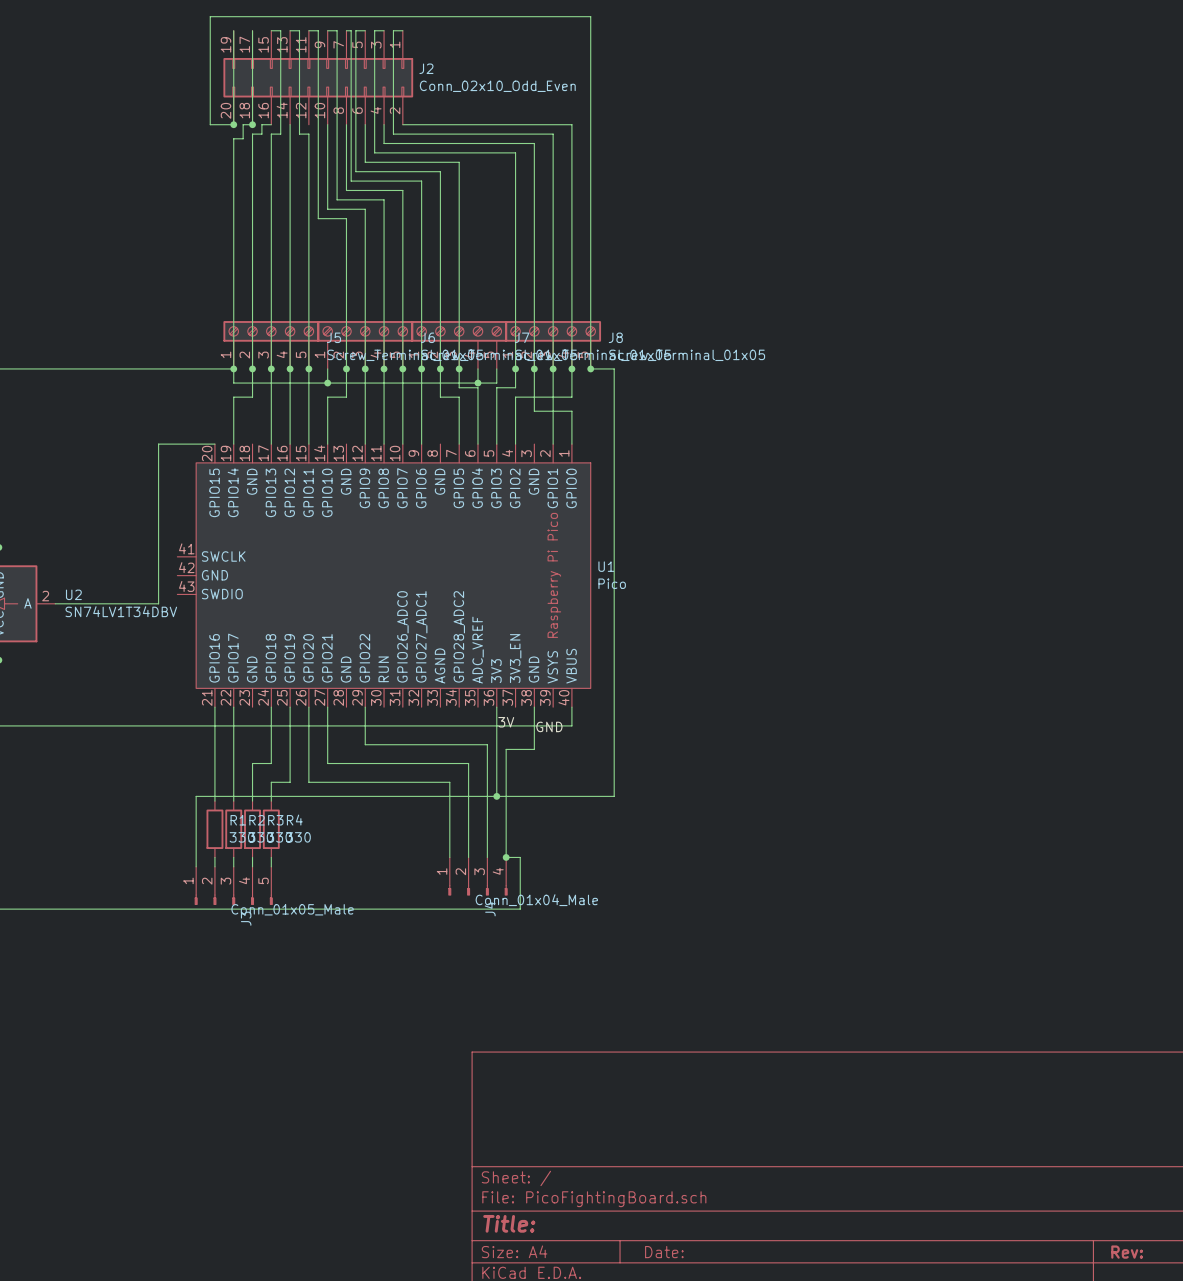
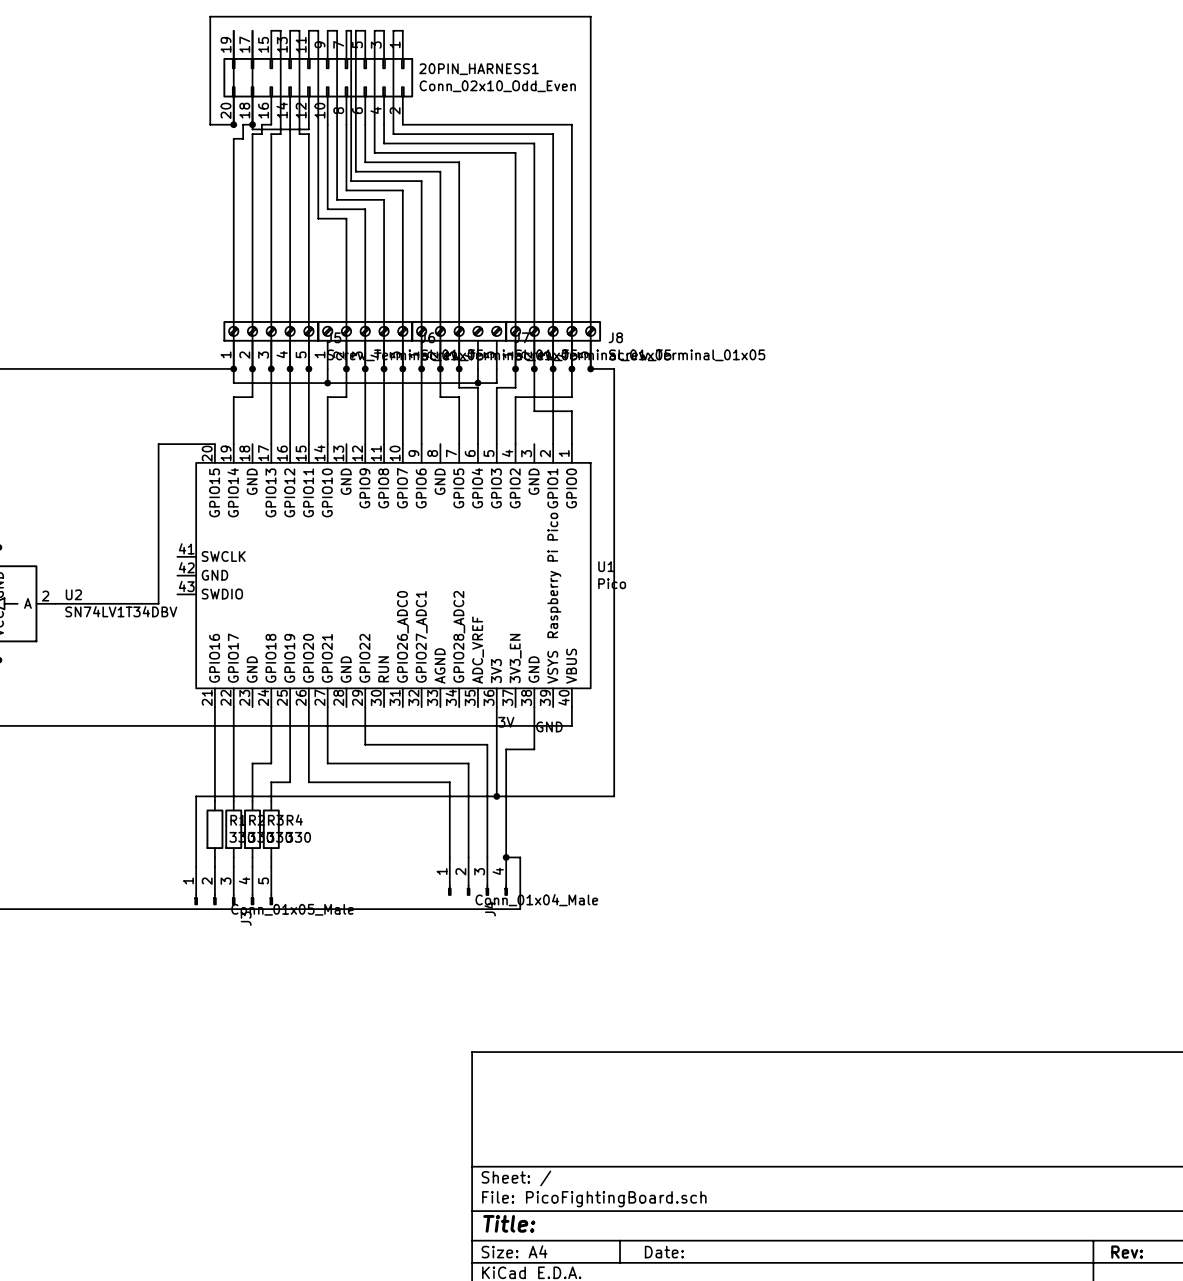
J2 name: J2 (426, 68) -> 20PIN_HARNESS1 (478, 69)
wire: none -> (252, 124) (252, 129) (308, 129) (308, 124)

